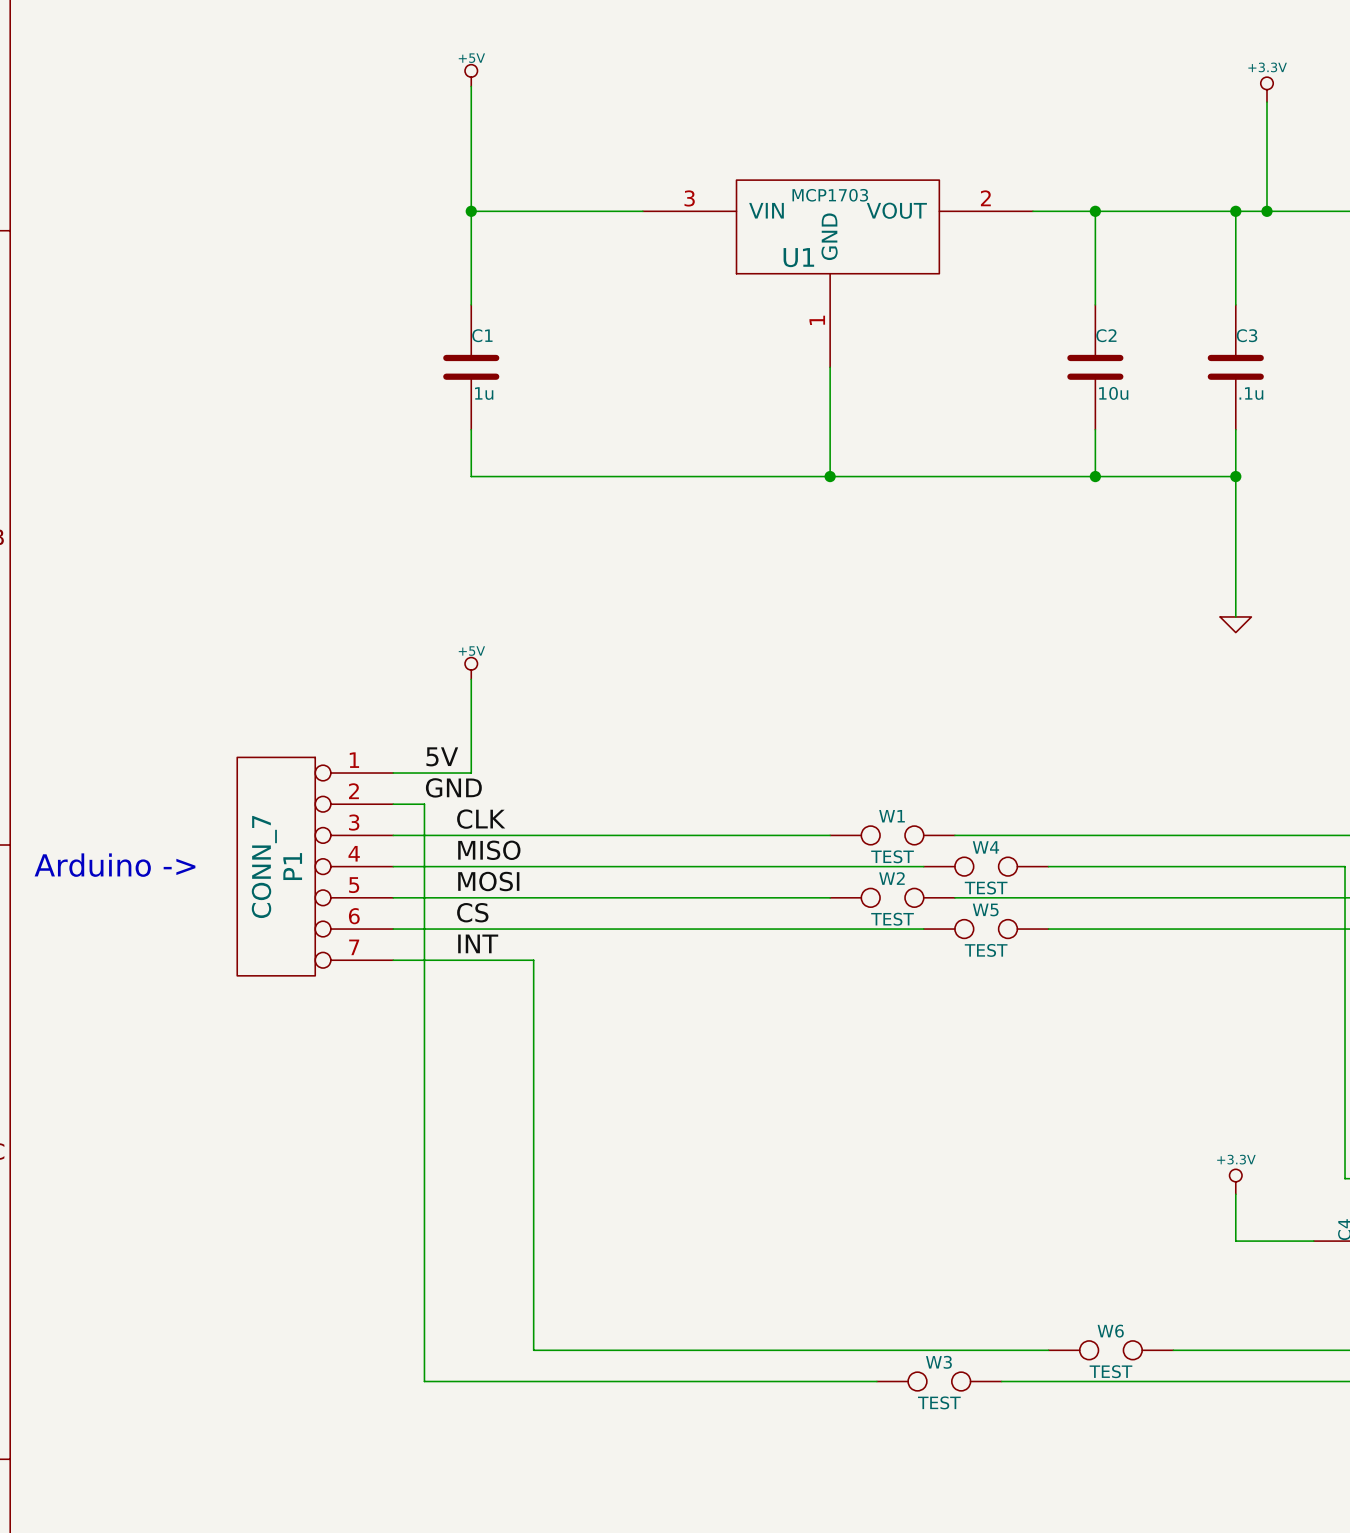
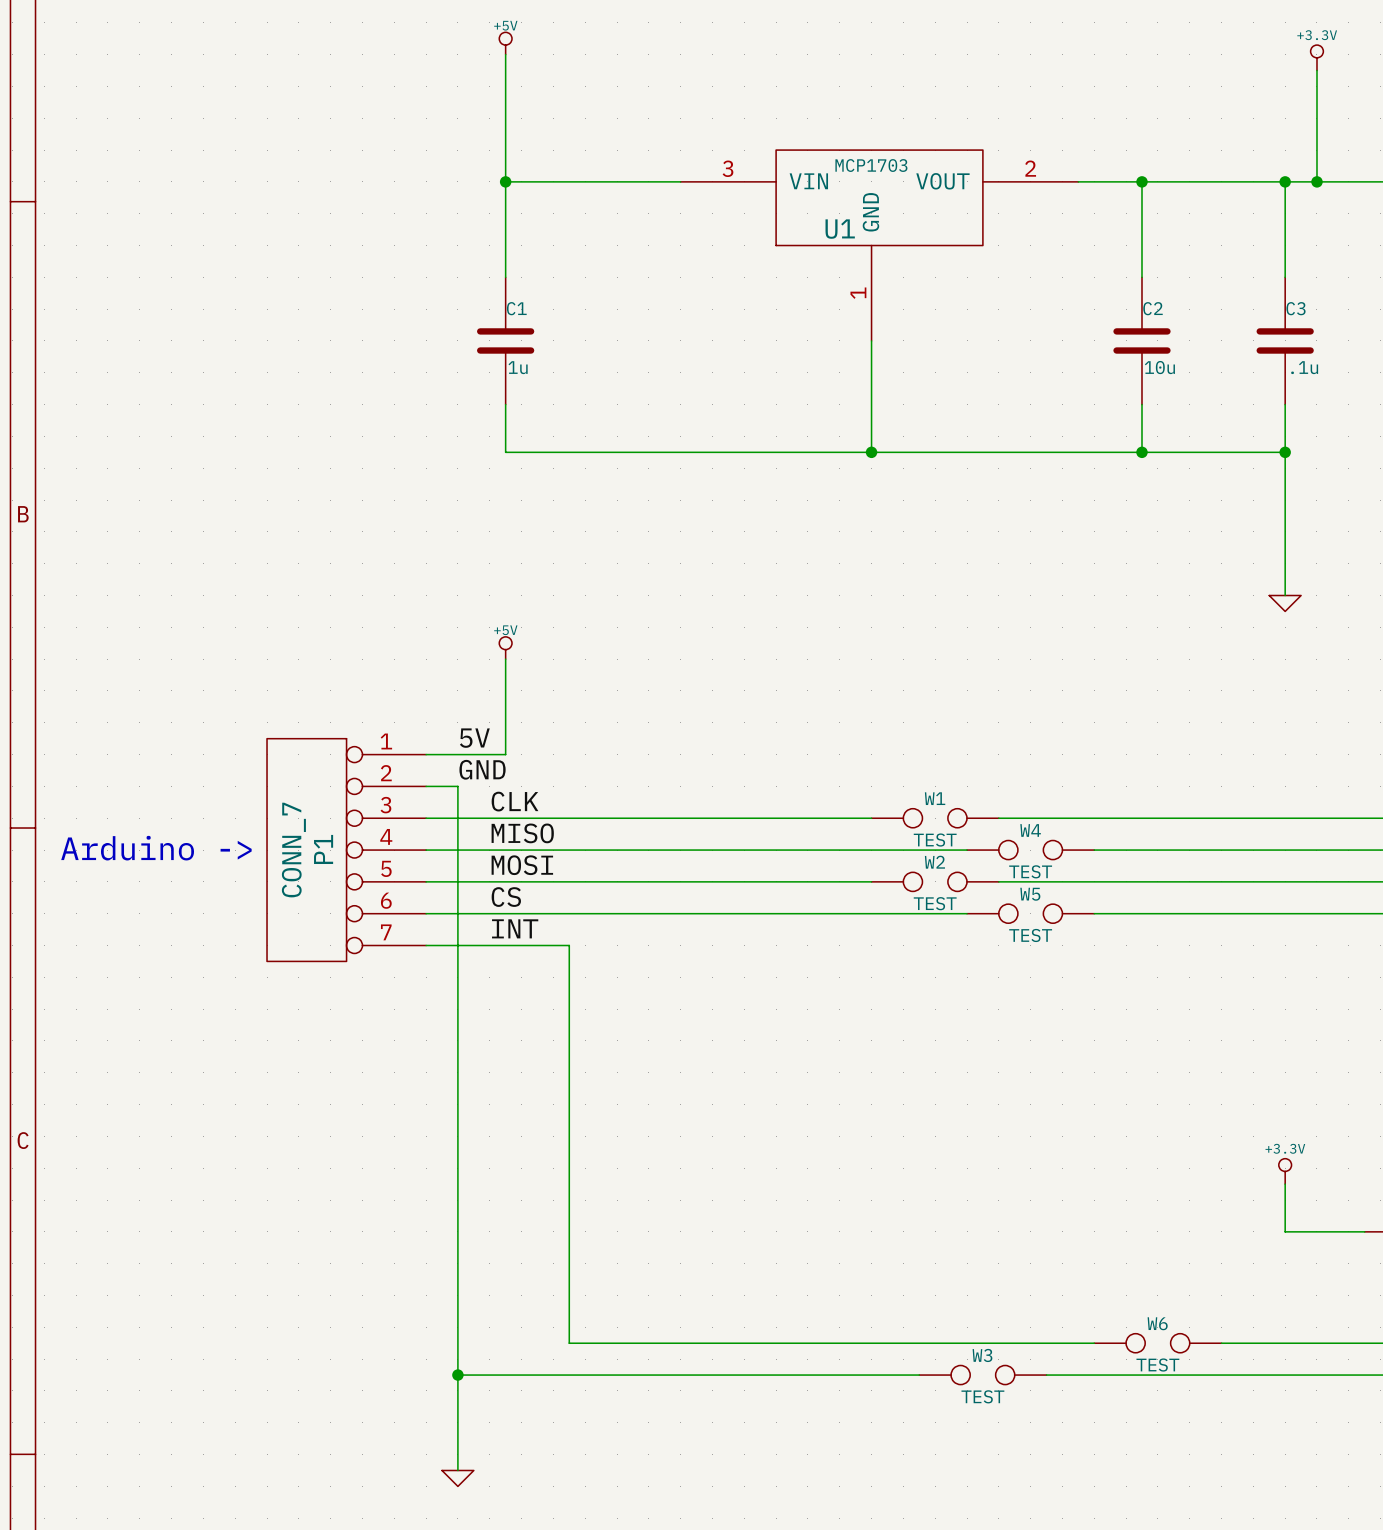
wire: none -> (457, 1375) (457, 1470)
junction: none -> (457, 1375)
power symbol: none -> (457, 1478)

